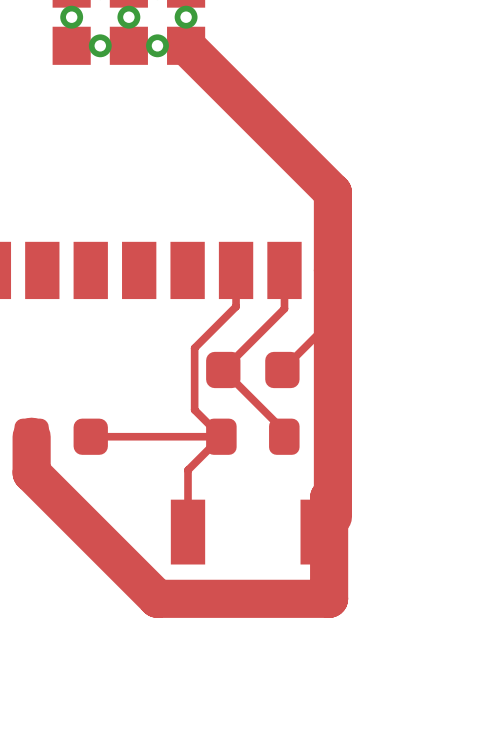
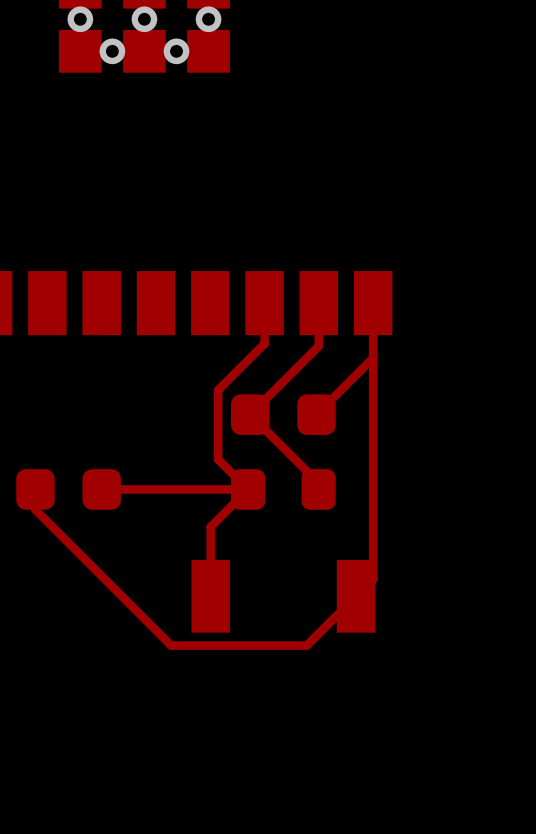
top track: (186, 45) (332, 192) (332, 319) -> none
top track width: thick (332, 319) (332, 516) -> thin (373, 358) (373, 579)
top track: (31, 436) (31, 472) (157, 598) (329, 598) (329, 497) (332, 493) -> none
top track: none -> (35, 509) (171, 645) (306, 645) (356, 596)

